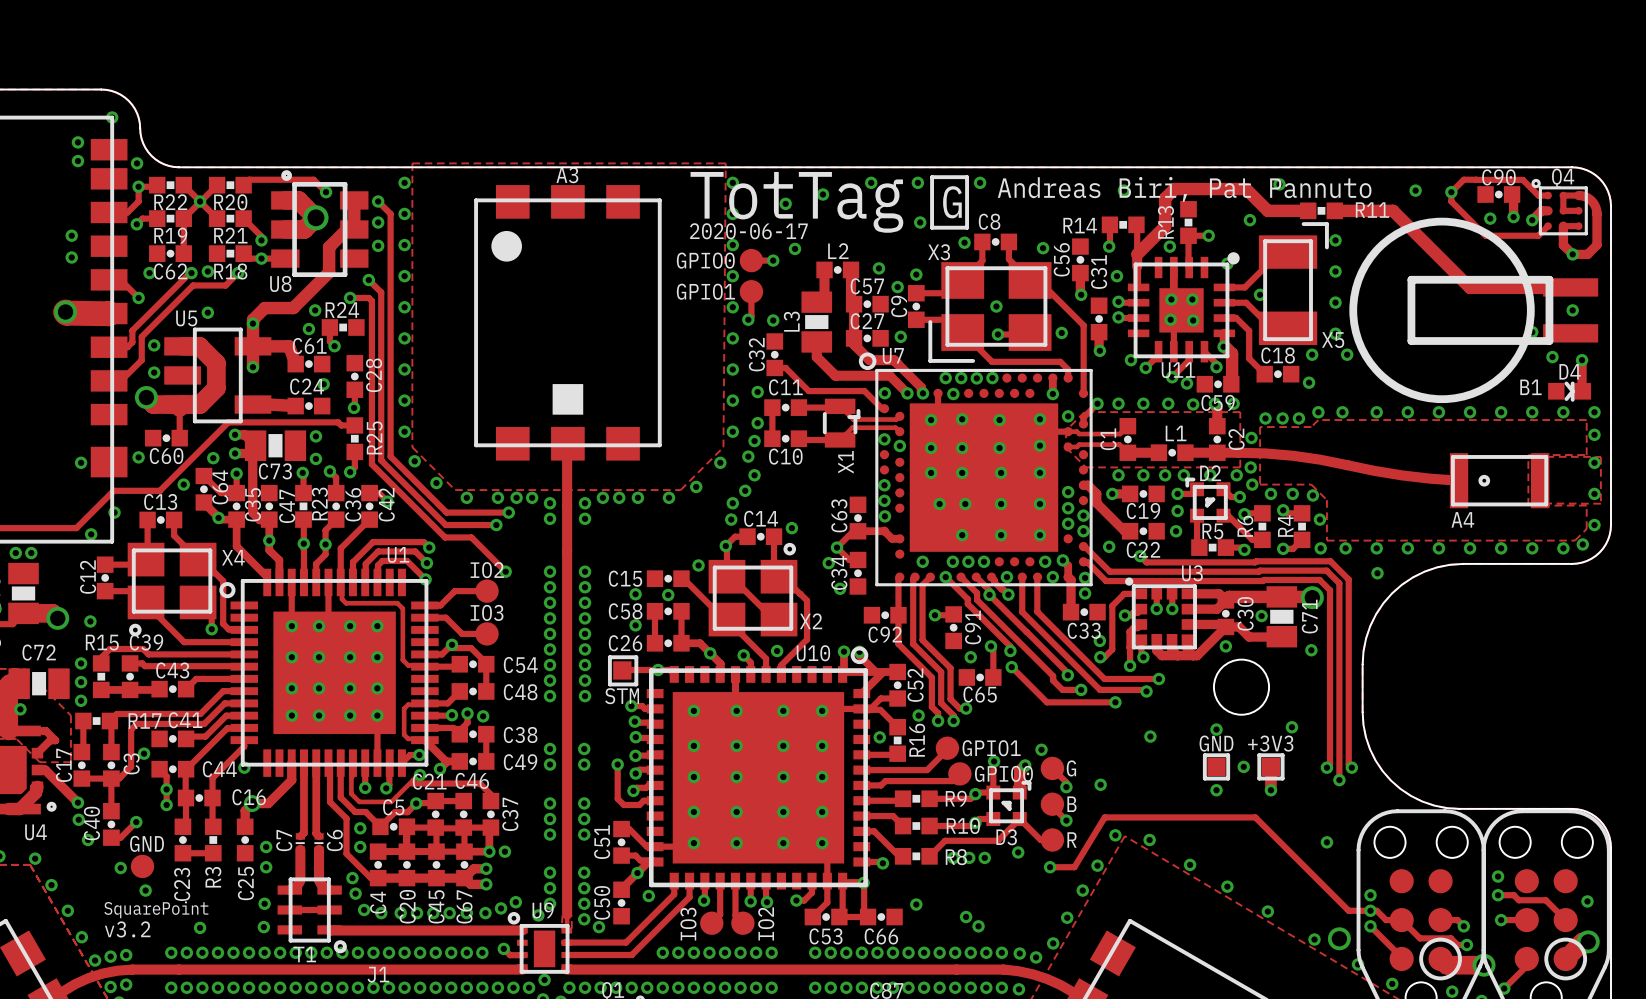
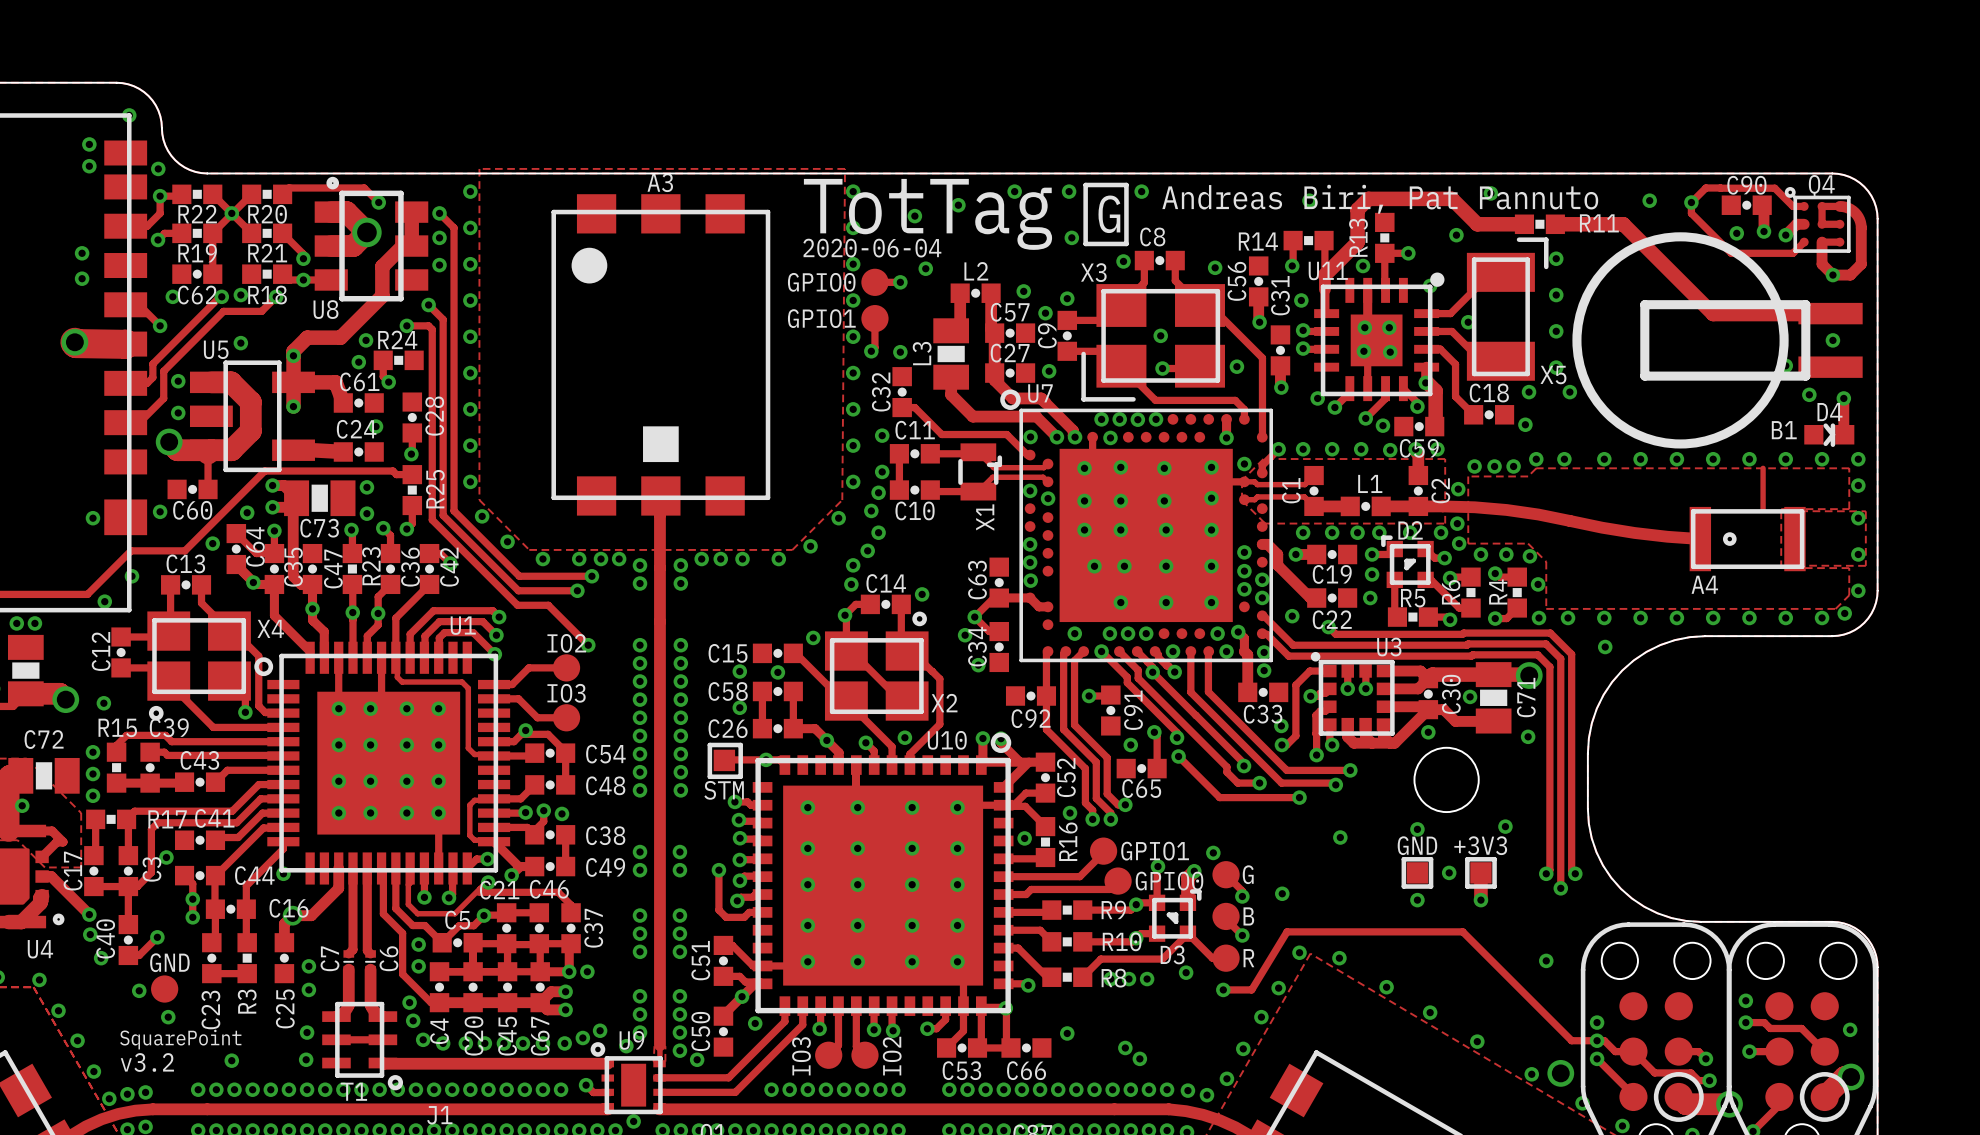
text: 2020-06-17 (748, 231) -> 2020-06-04 (872, 248)
U11 name position: U11 (1178, 370) -> U11 (1328, 270)
track: none -> (1763, 468) (1763, 509)

